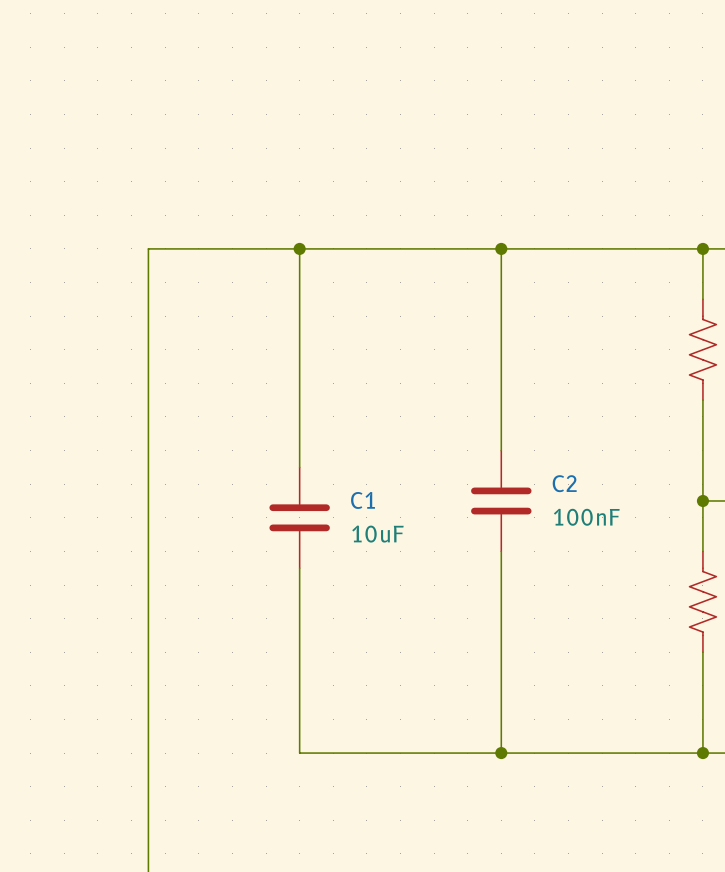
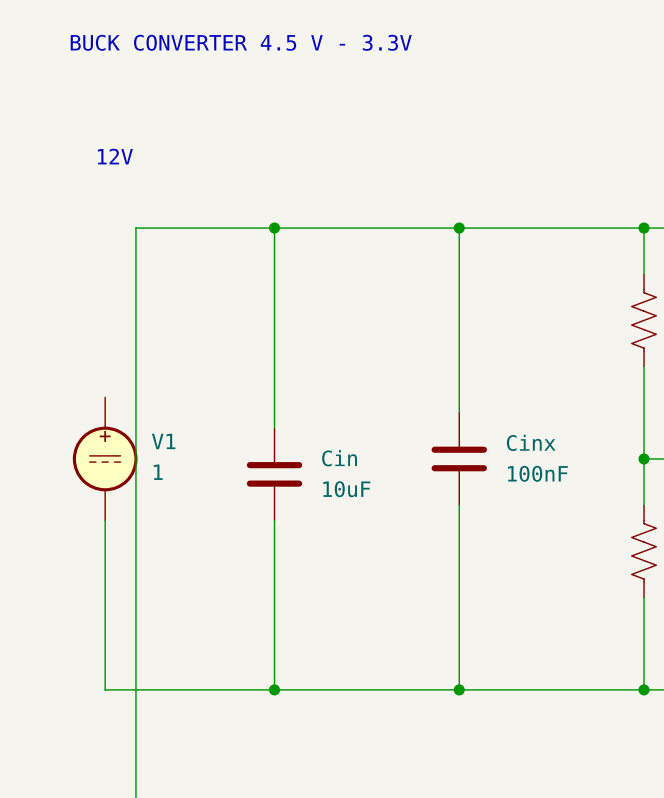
text: none -> BUCK CONVERTER 4.5 V - 3.3V (241, 42)
text: none -> 12V (115, 156)
C2 name: C2 (564, 483) -> Cinx (531, 442)
V1: none -> 1 (105, 458)
C1 name: C1 (362, 500) -> Cin (339, 458)
wire: none -> (105, 520) (105, 689) (274, 689)
junction: none -> (274, 689)

